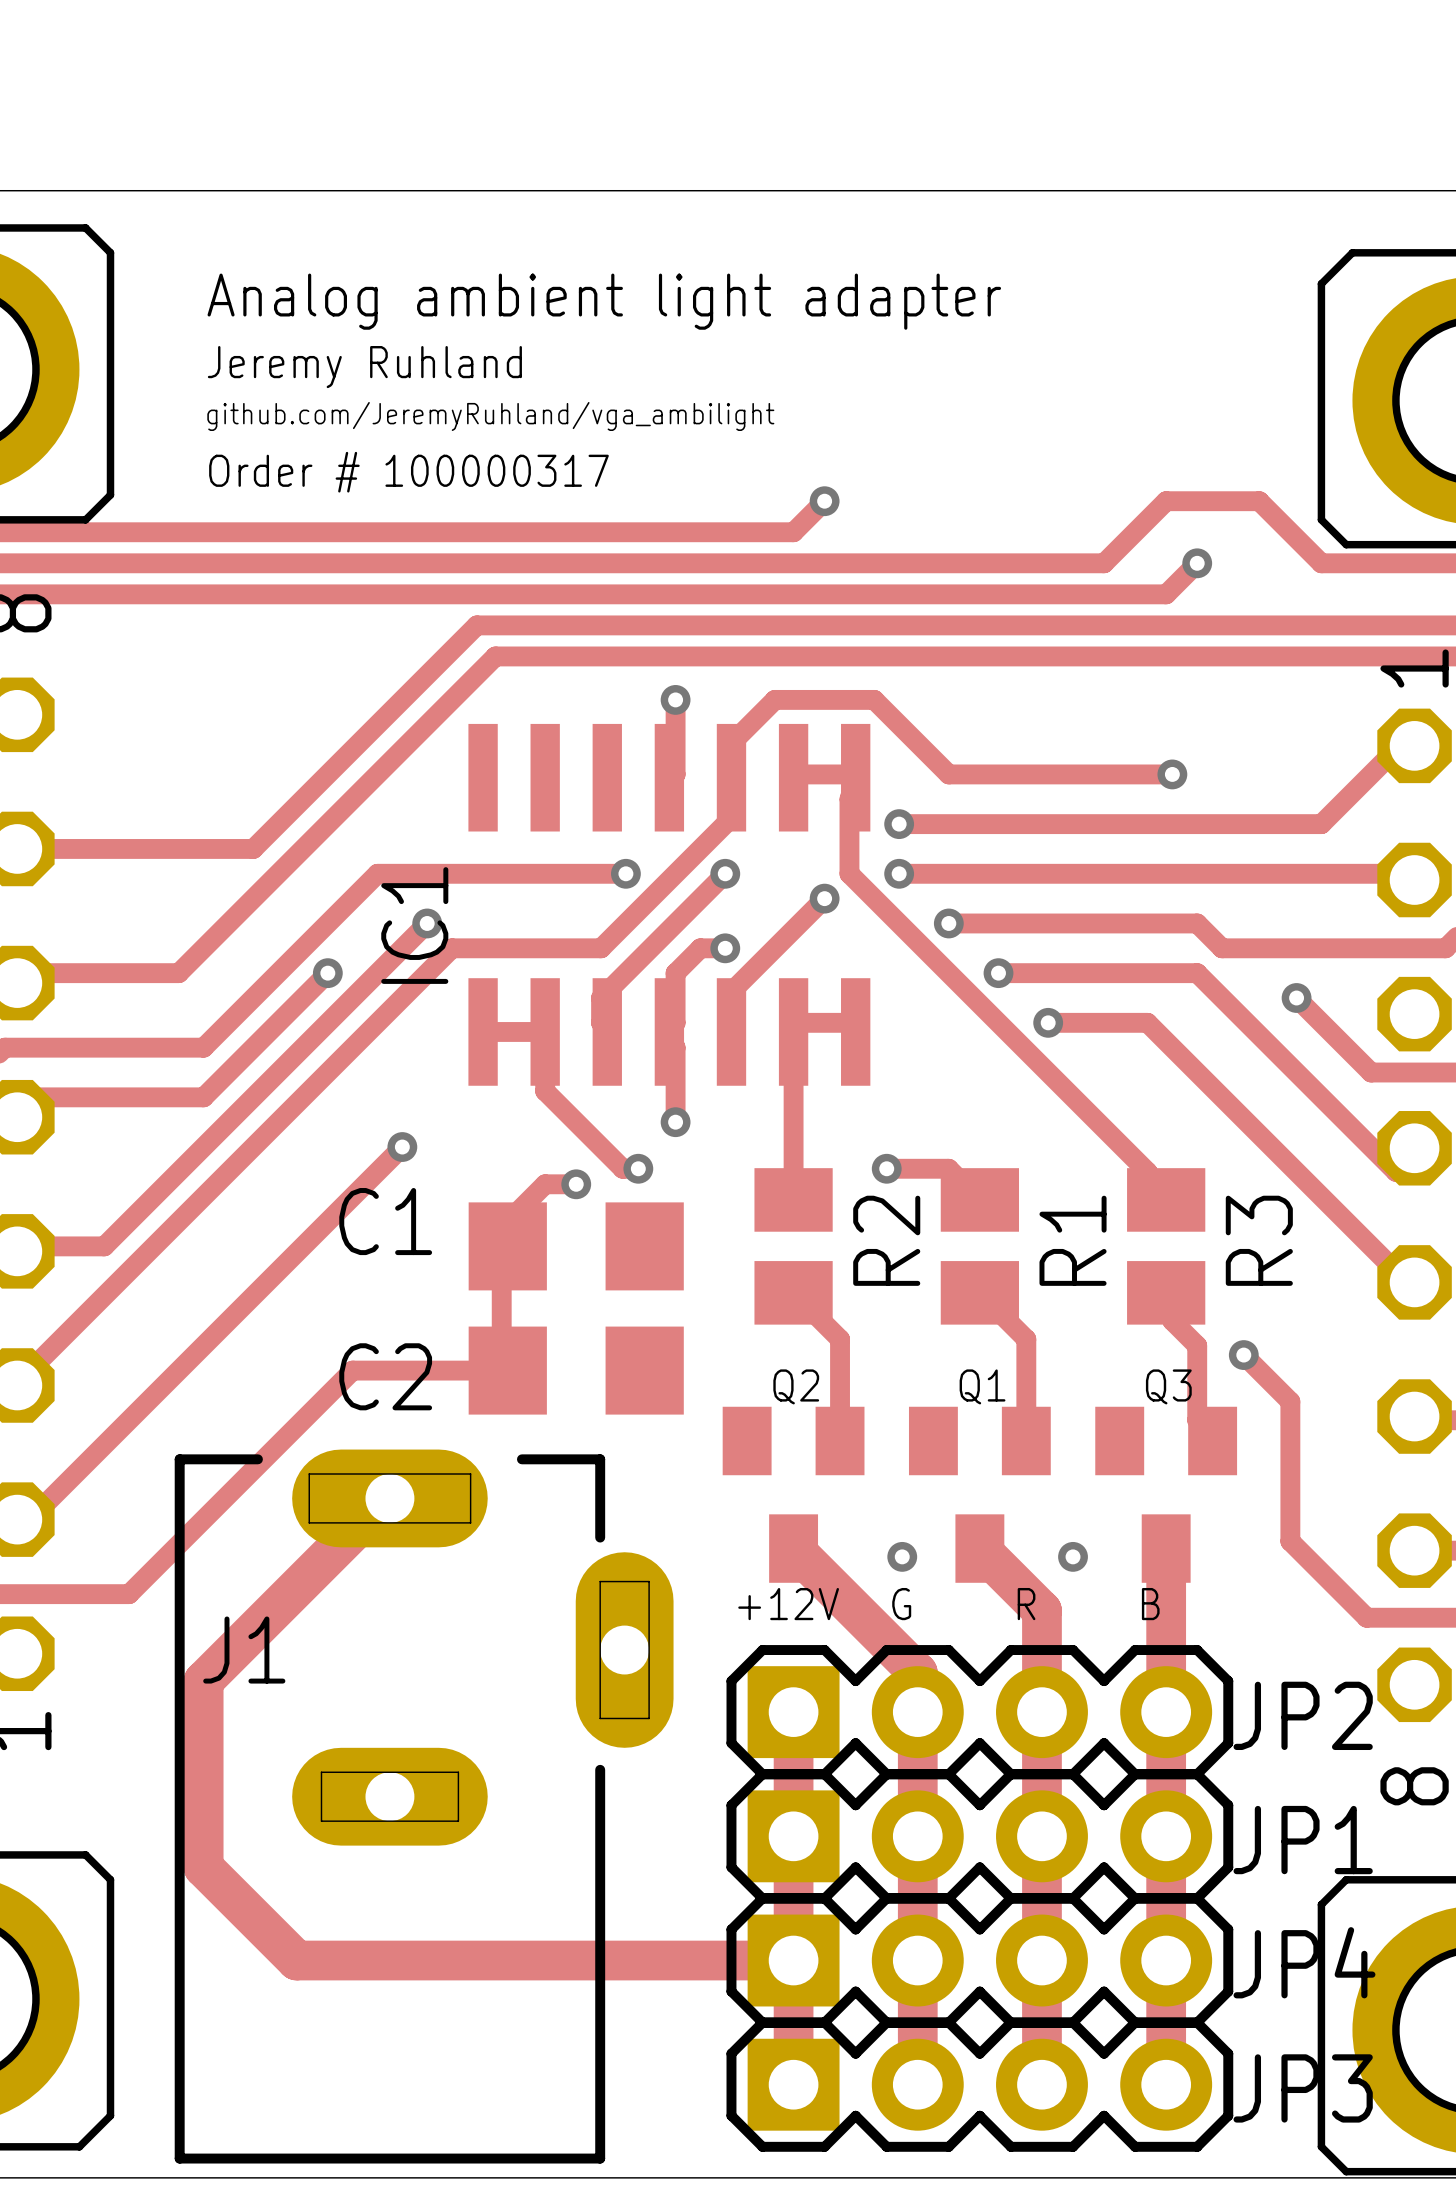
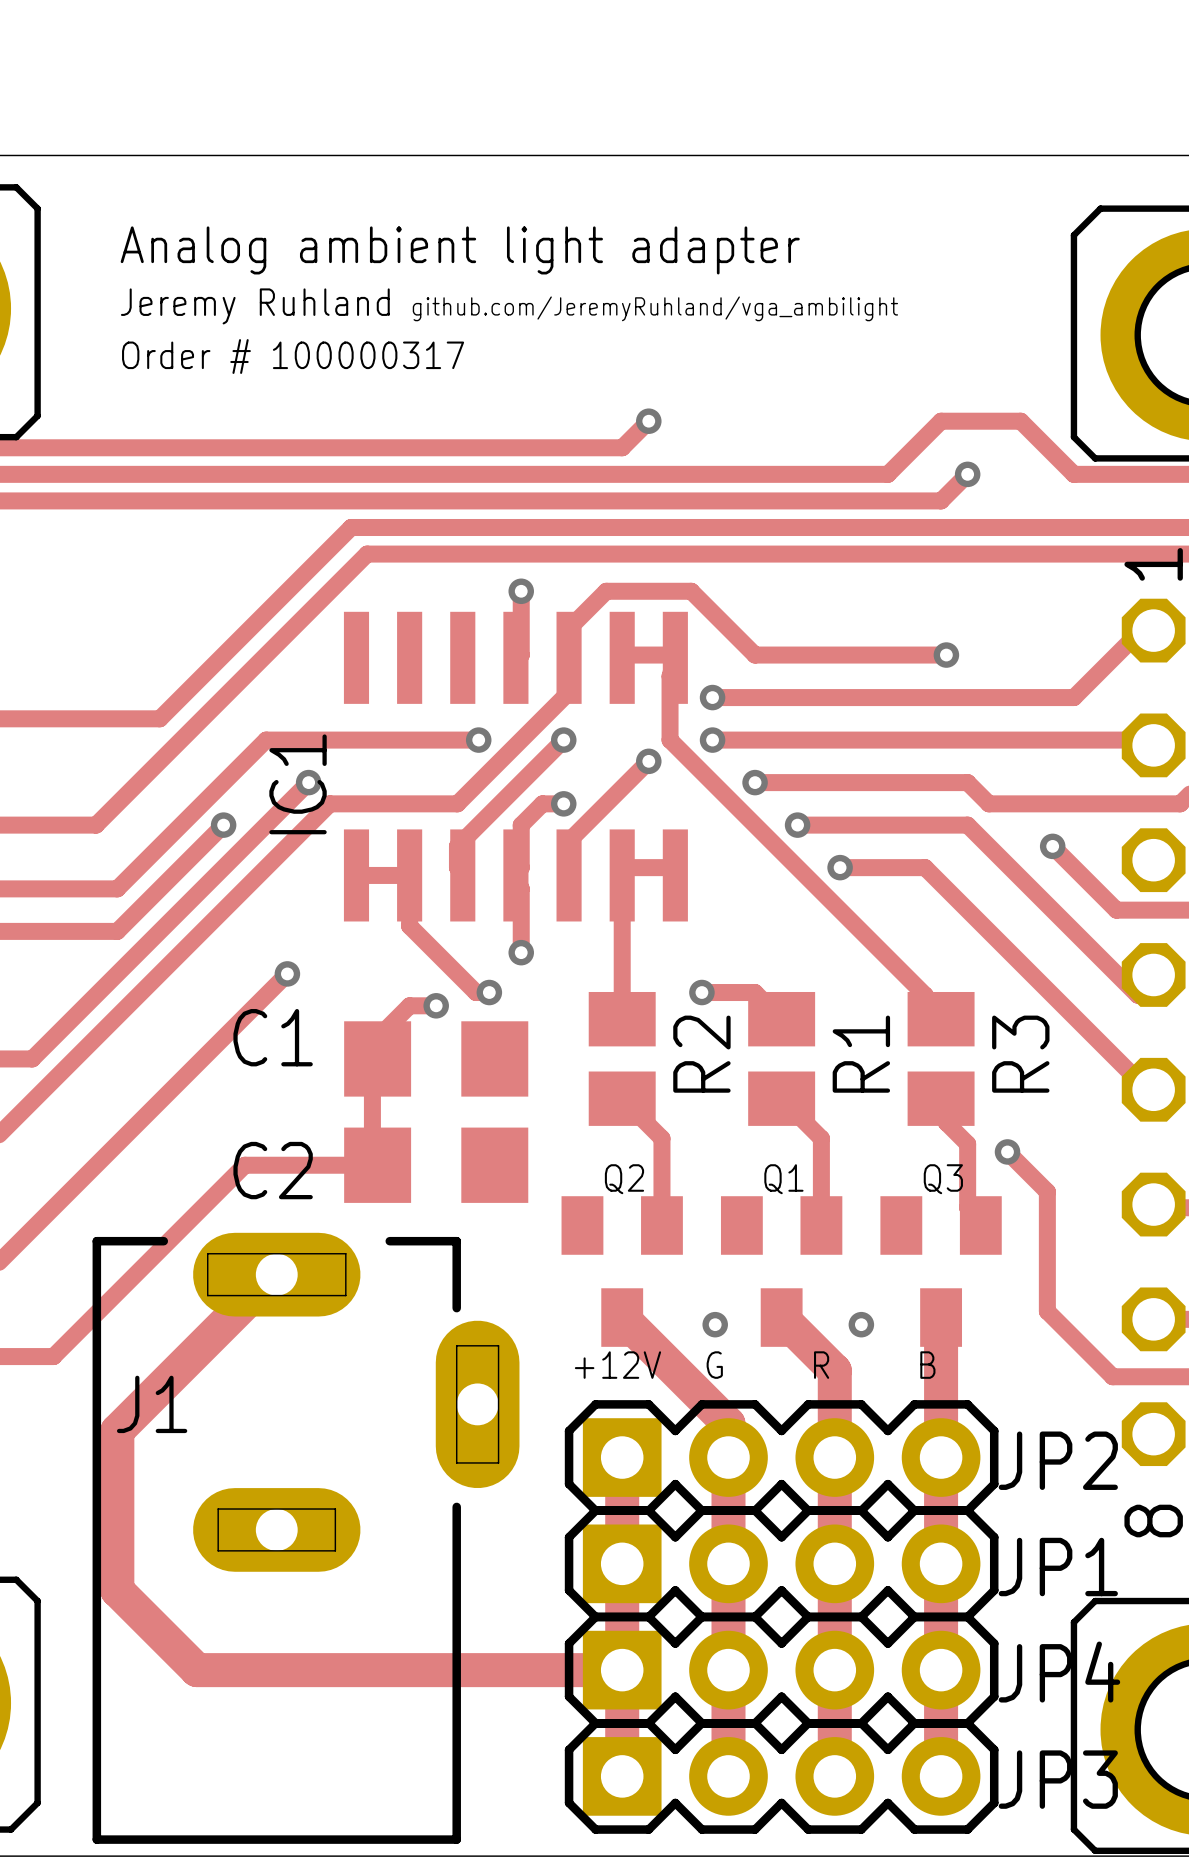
text position: github.com/JeremyRuhland/vga_ambilight (490, 416) -> github.com/JeremyRuhland/vga_ambilight (655, 308)
text position: Order # 100000317 (408, 472) -> Order # 100000317 (293, 356)

